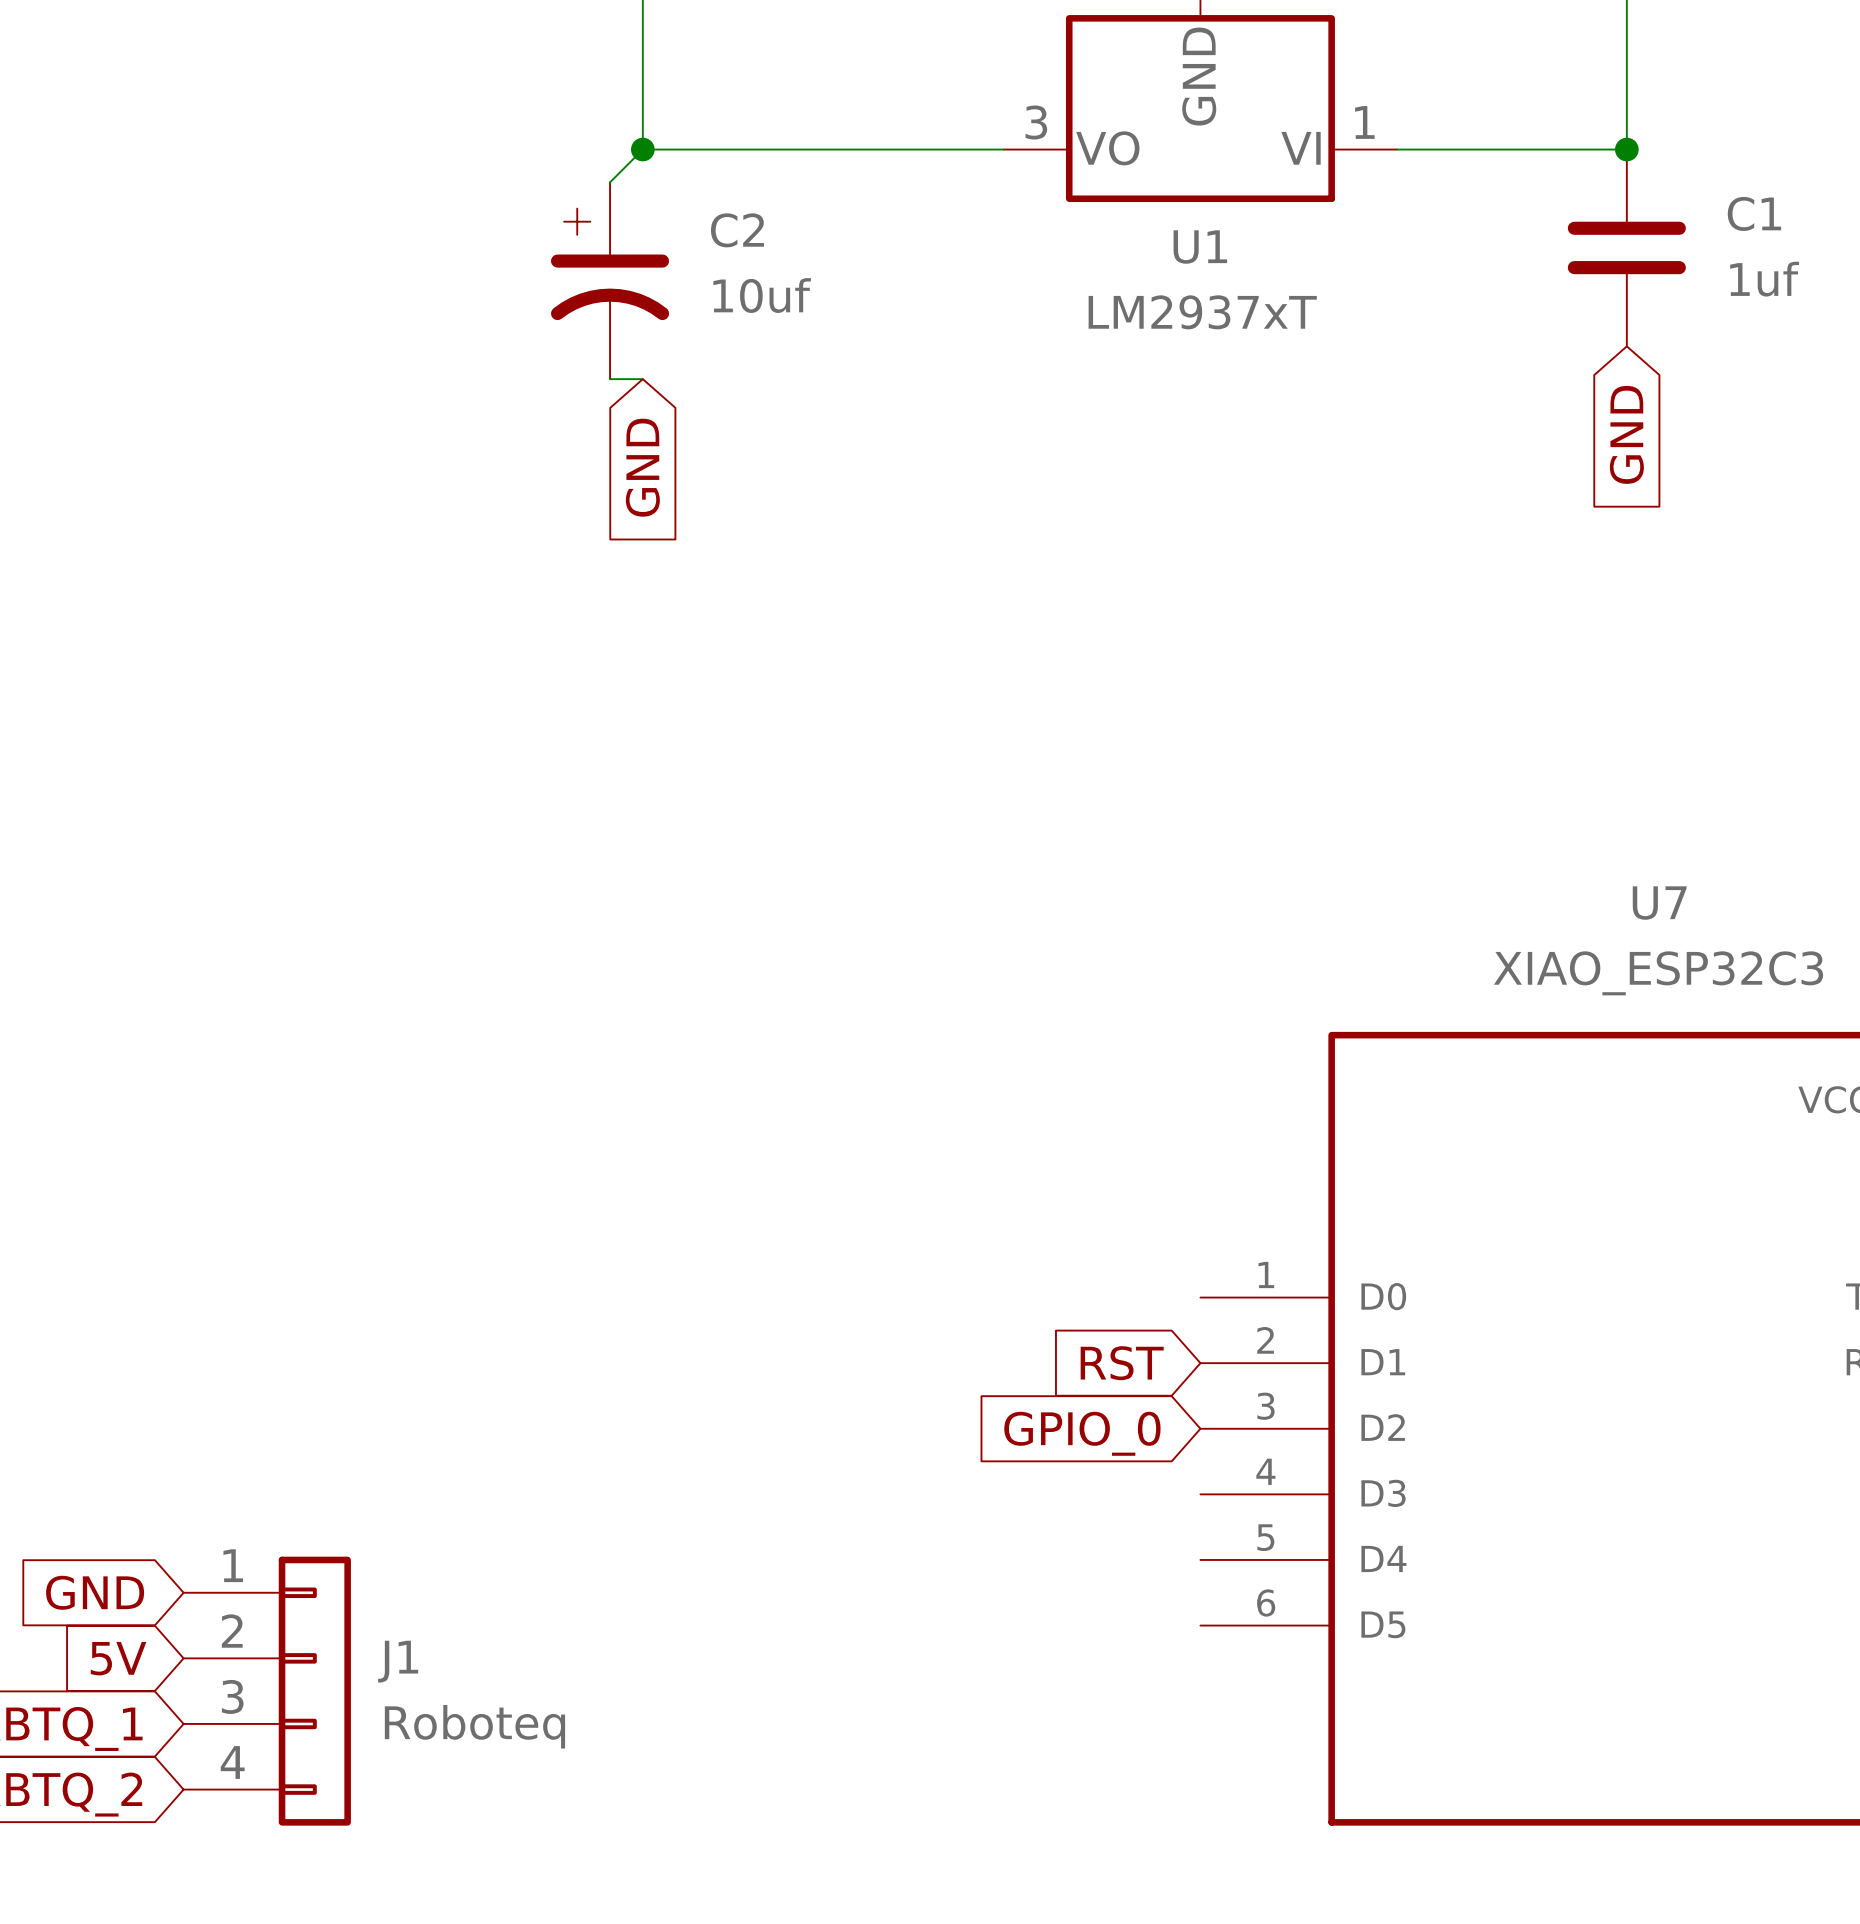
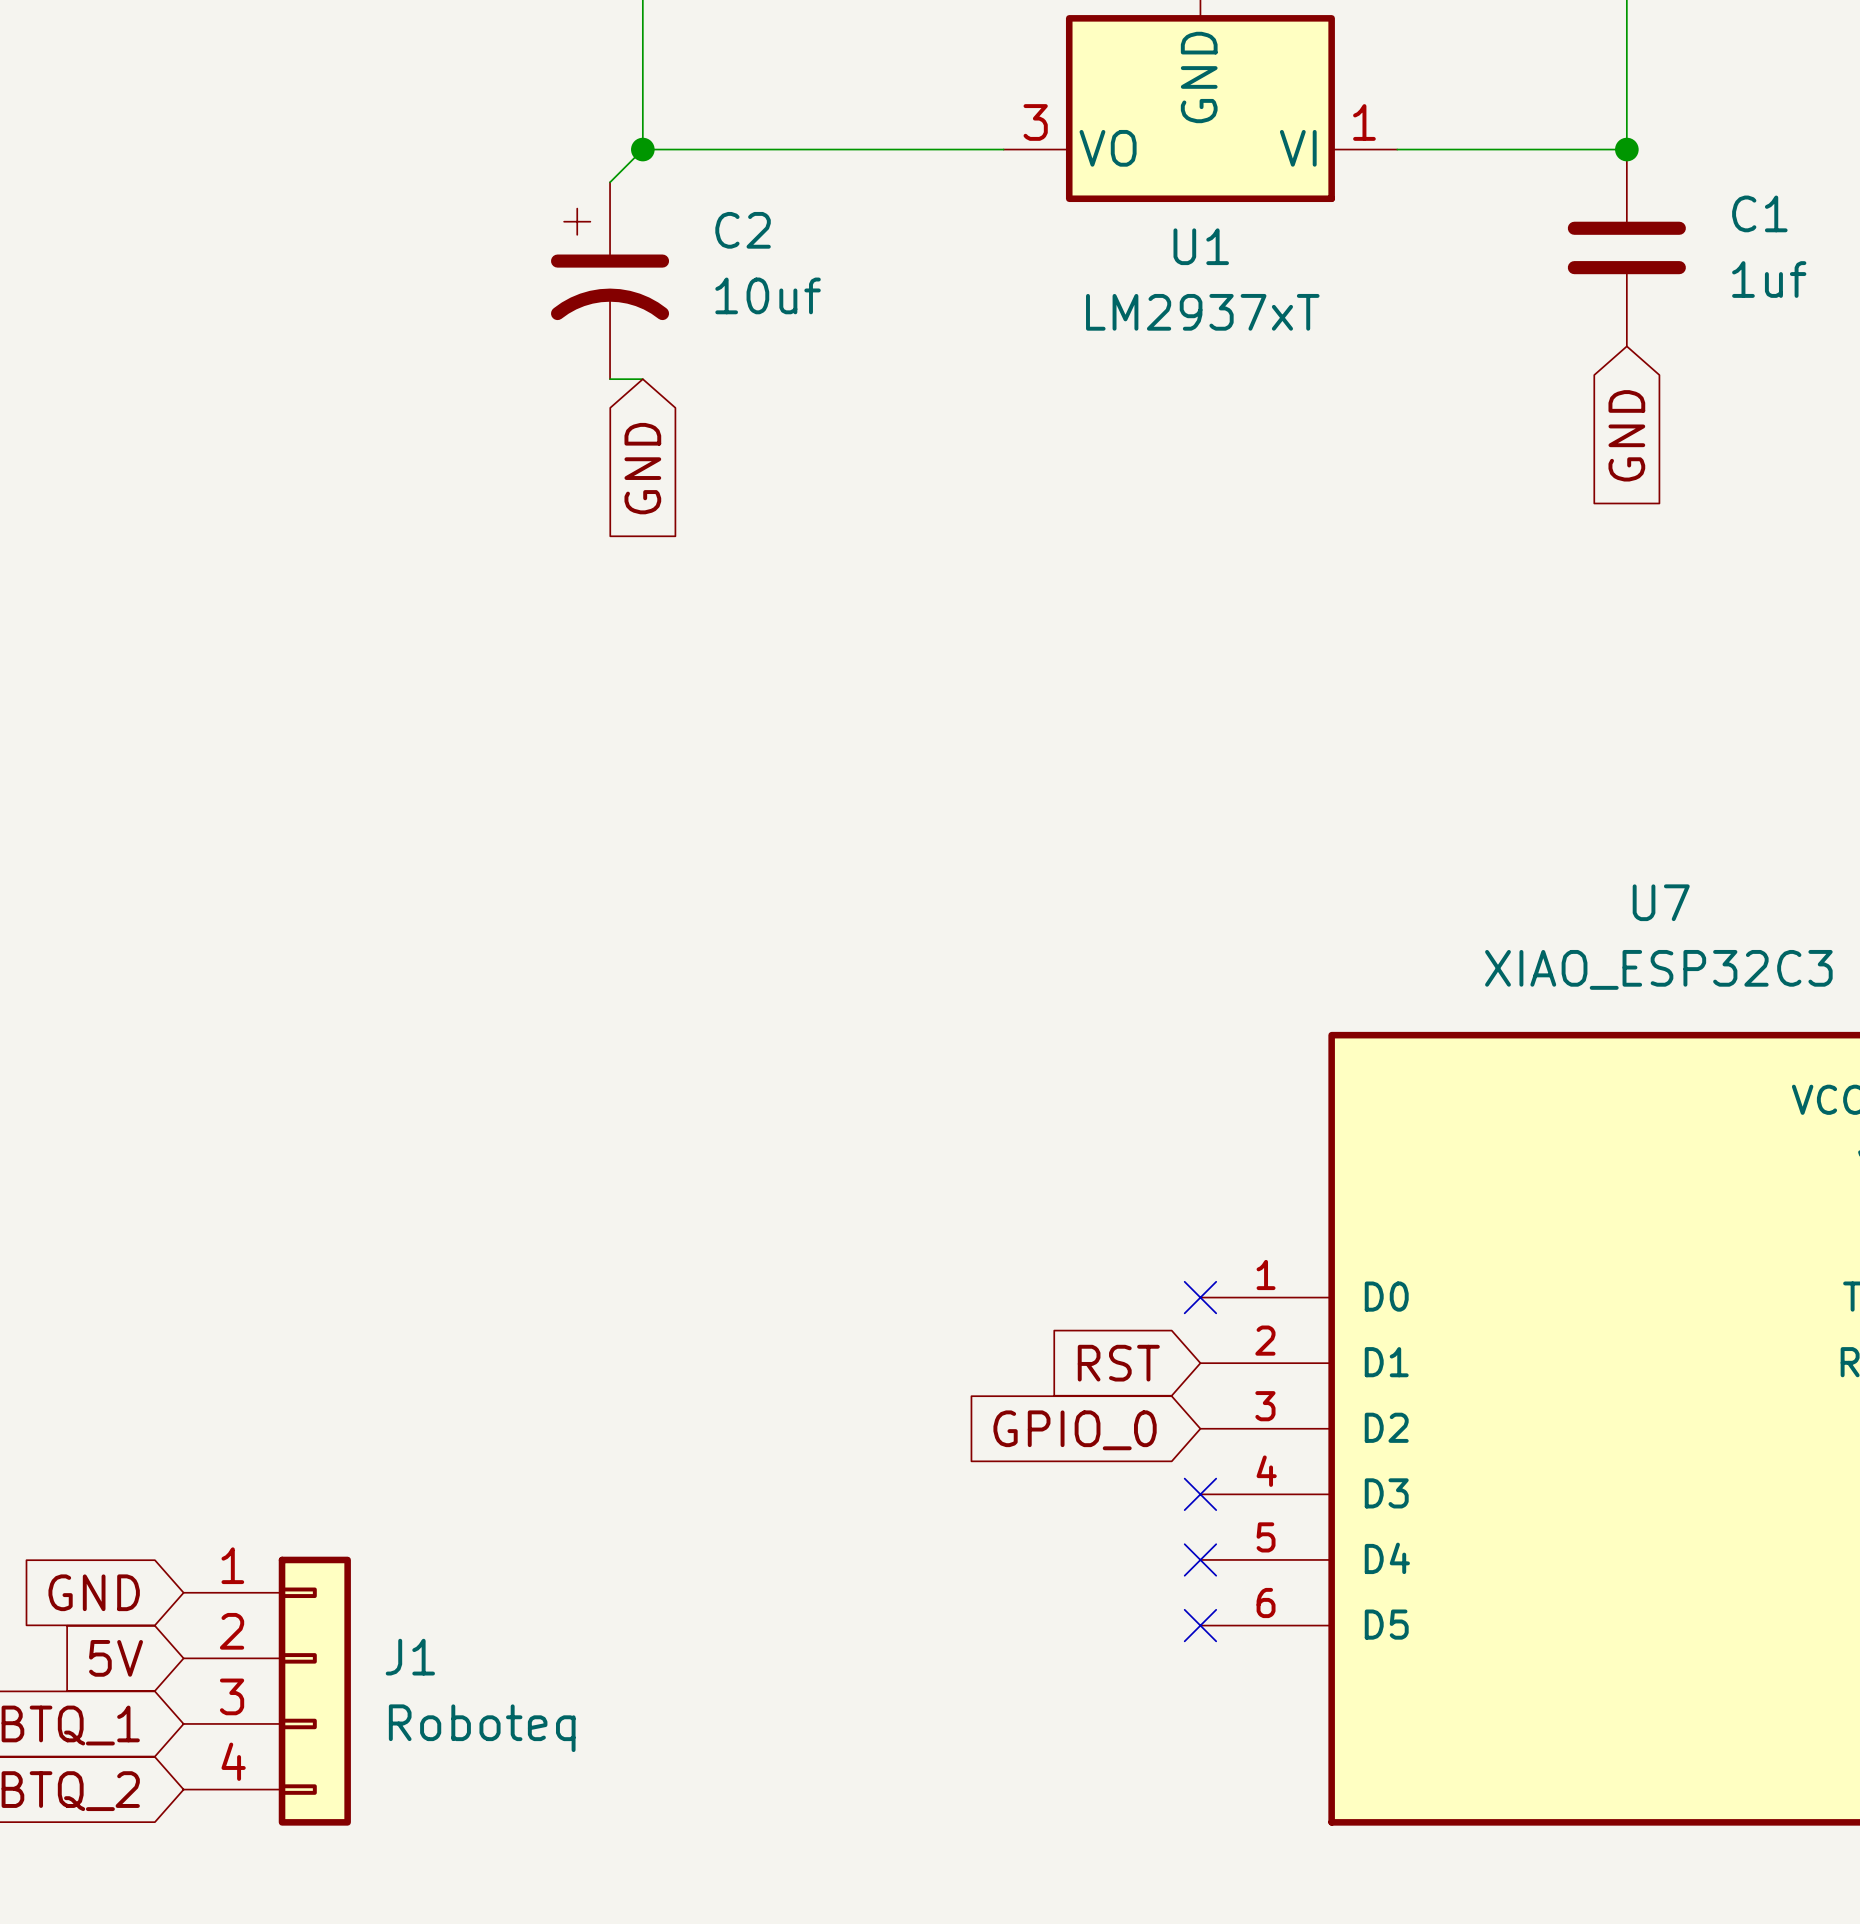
no-connect mark: none -> (1200, 1297)
no-connect mark: none -> (1200, 1494)
no-connect mark: none -> (1200, 1559)
no-connect mark: none -> (1200, 1625)

